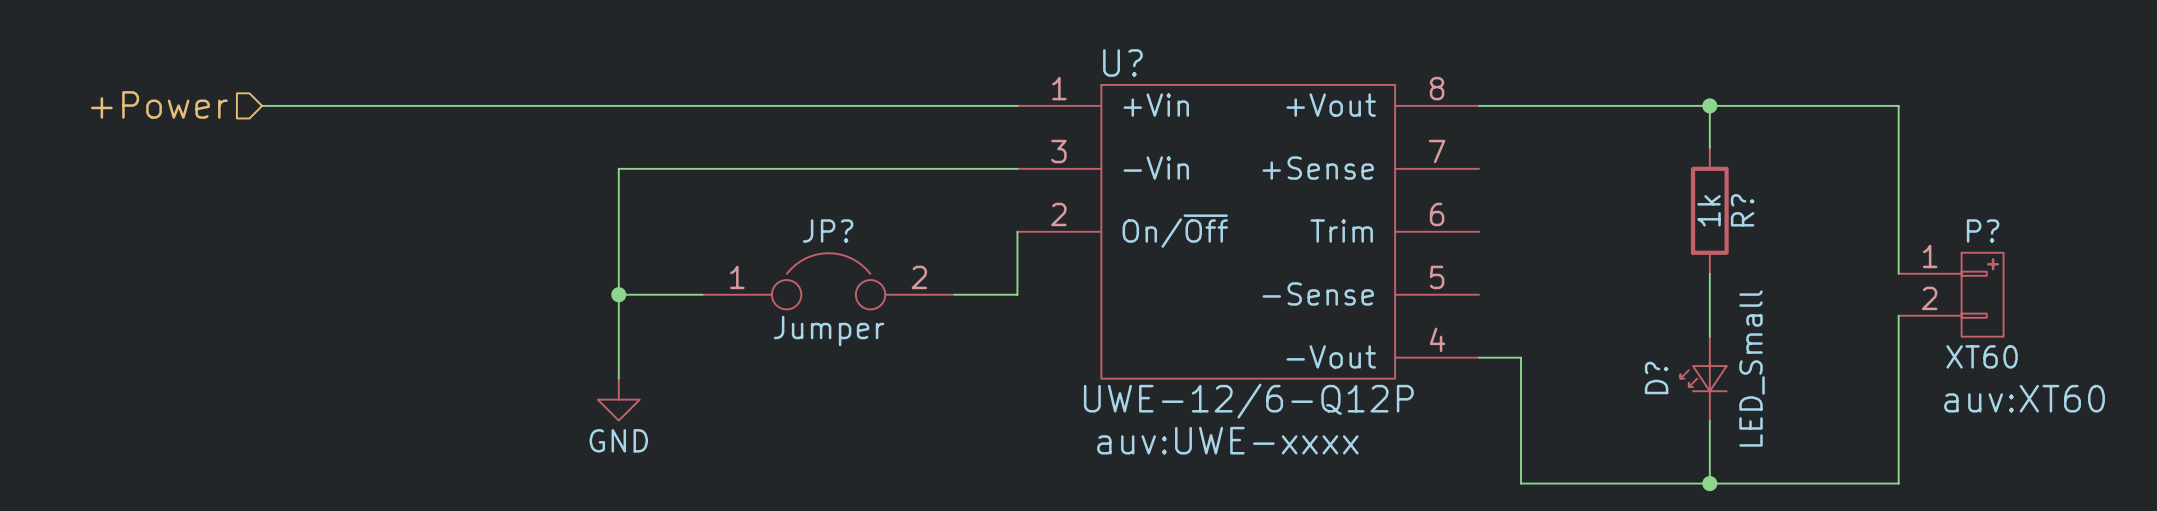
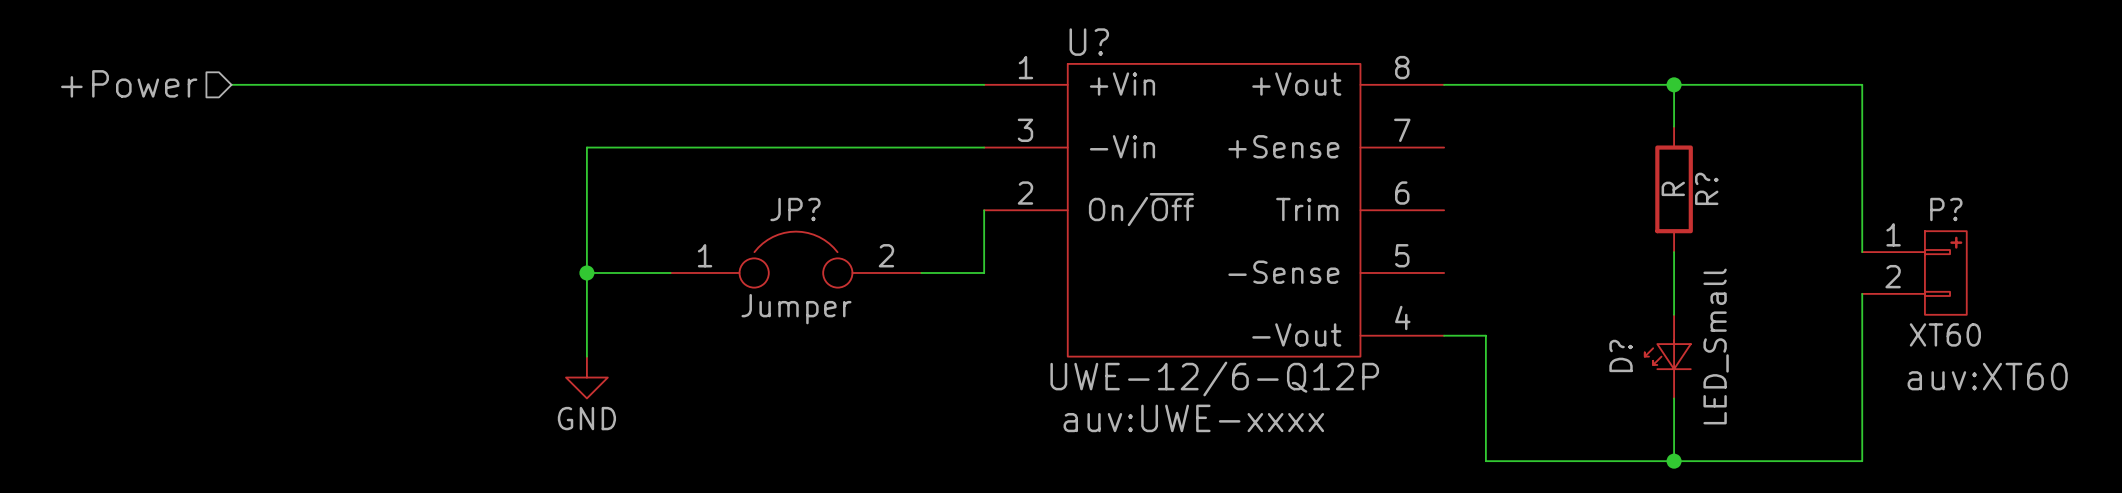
R? value: 1k (1709, 210) -> R (1673, 188)

